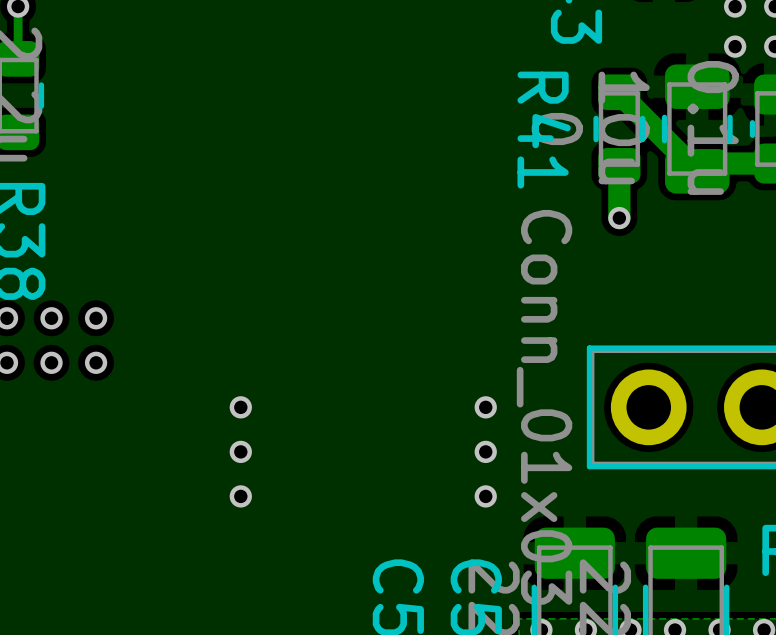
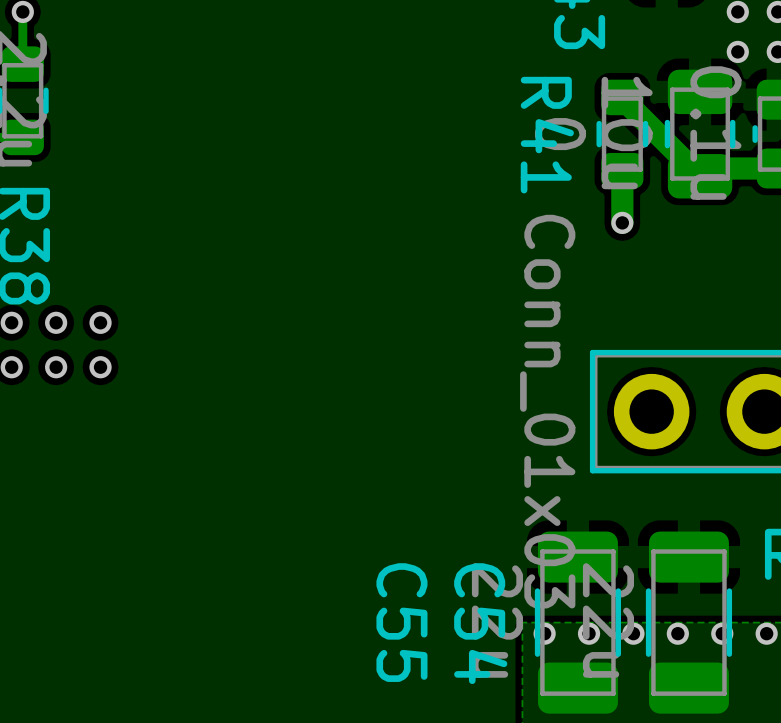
via: (240, 407) -> none
via: (485, 407) -> none
via: (240, 451) -> none
via: (485, 451) -> none
via: (240, 496) -> none
via: (485, 496) -> none

